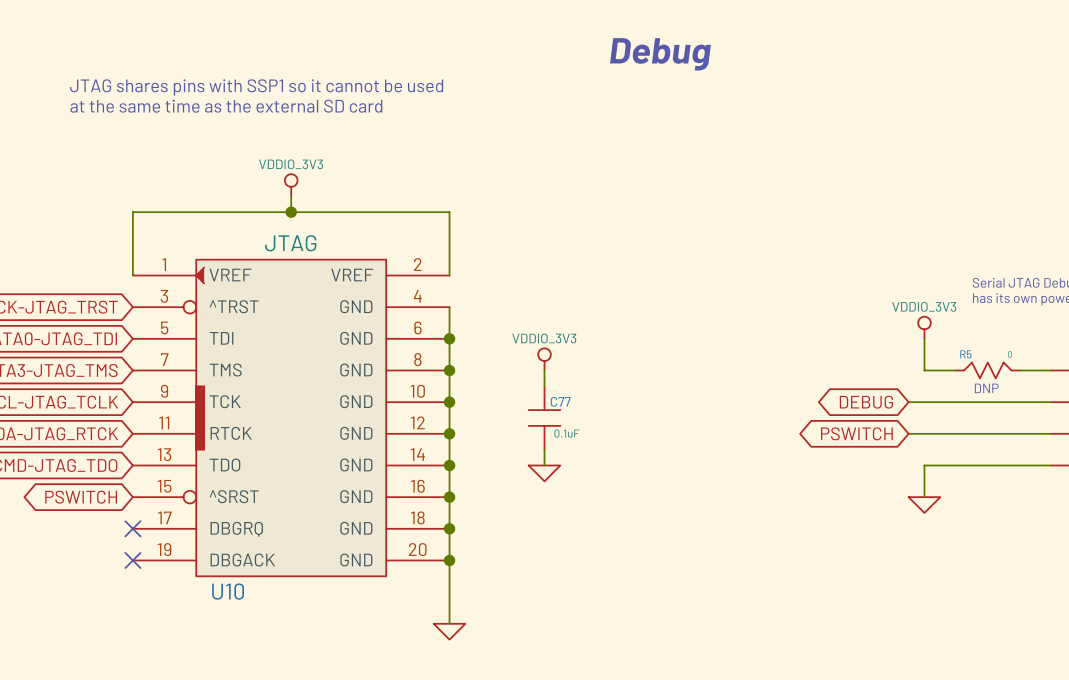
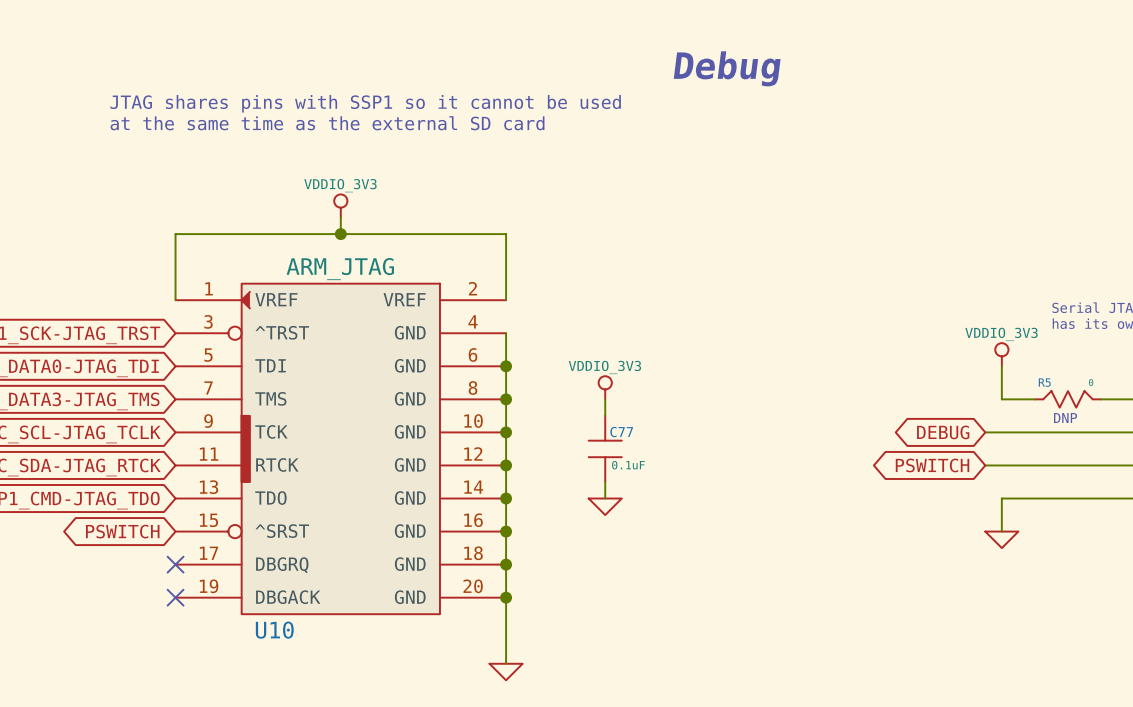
U10 value: JTAG (290, 243) -> ARM_JTAG (340, 269)

